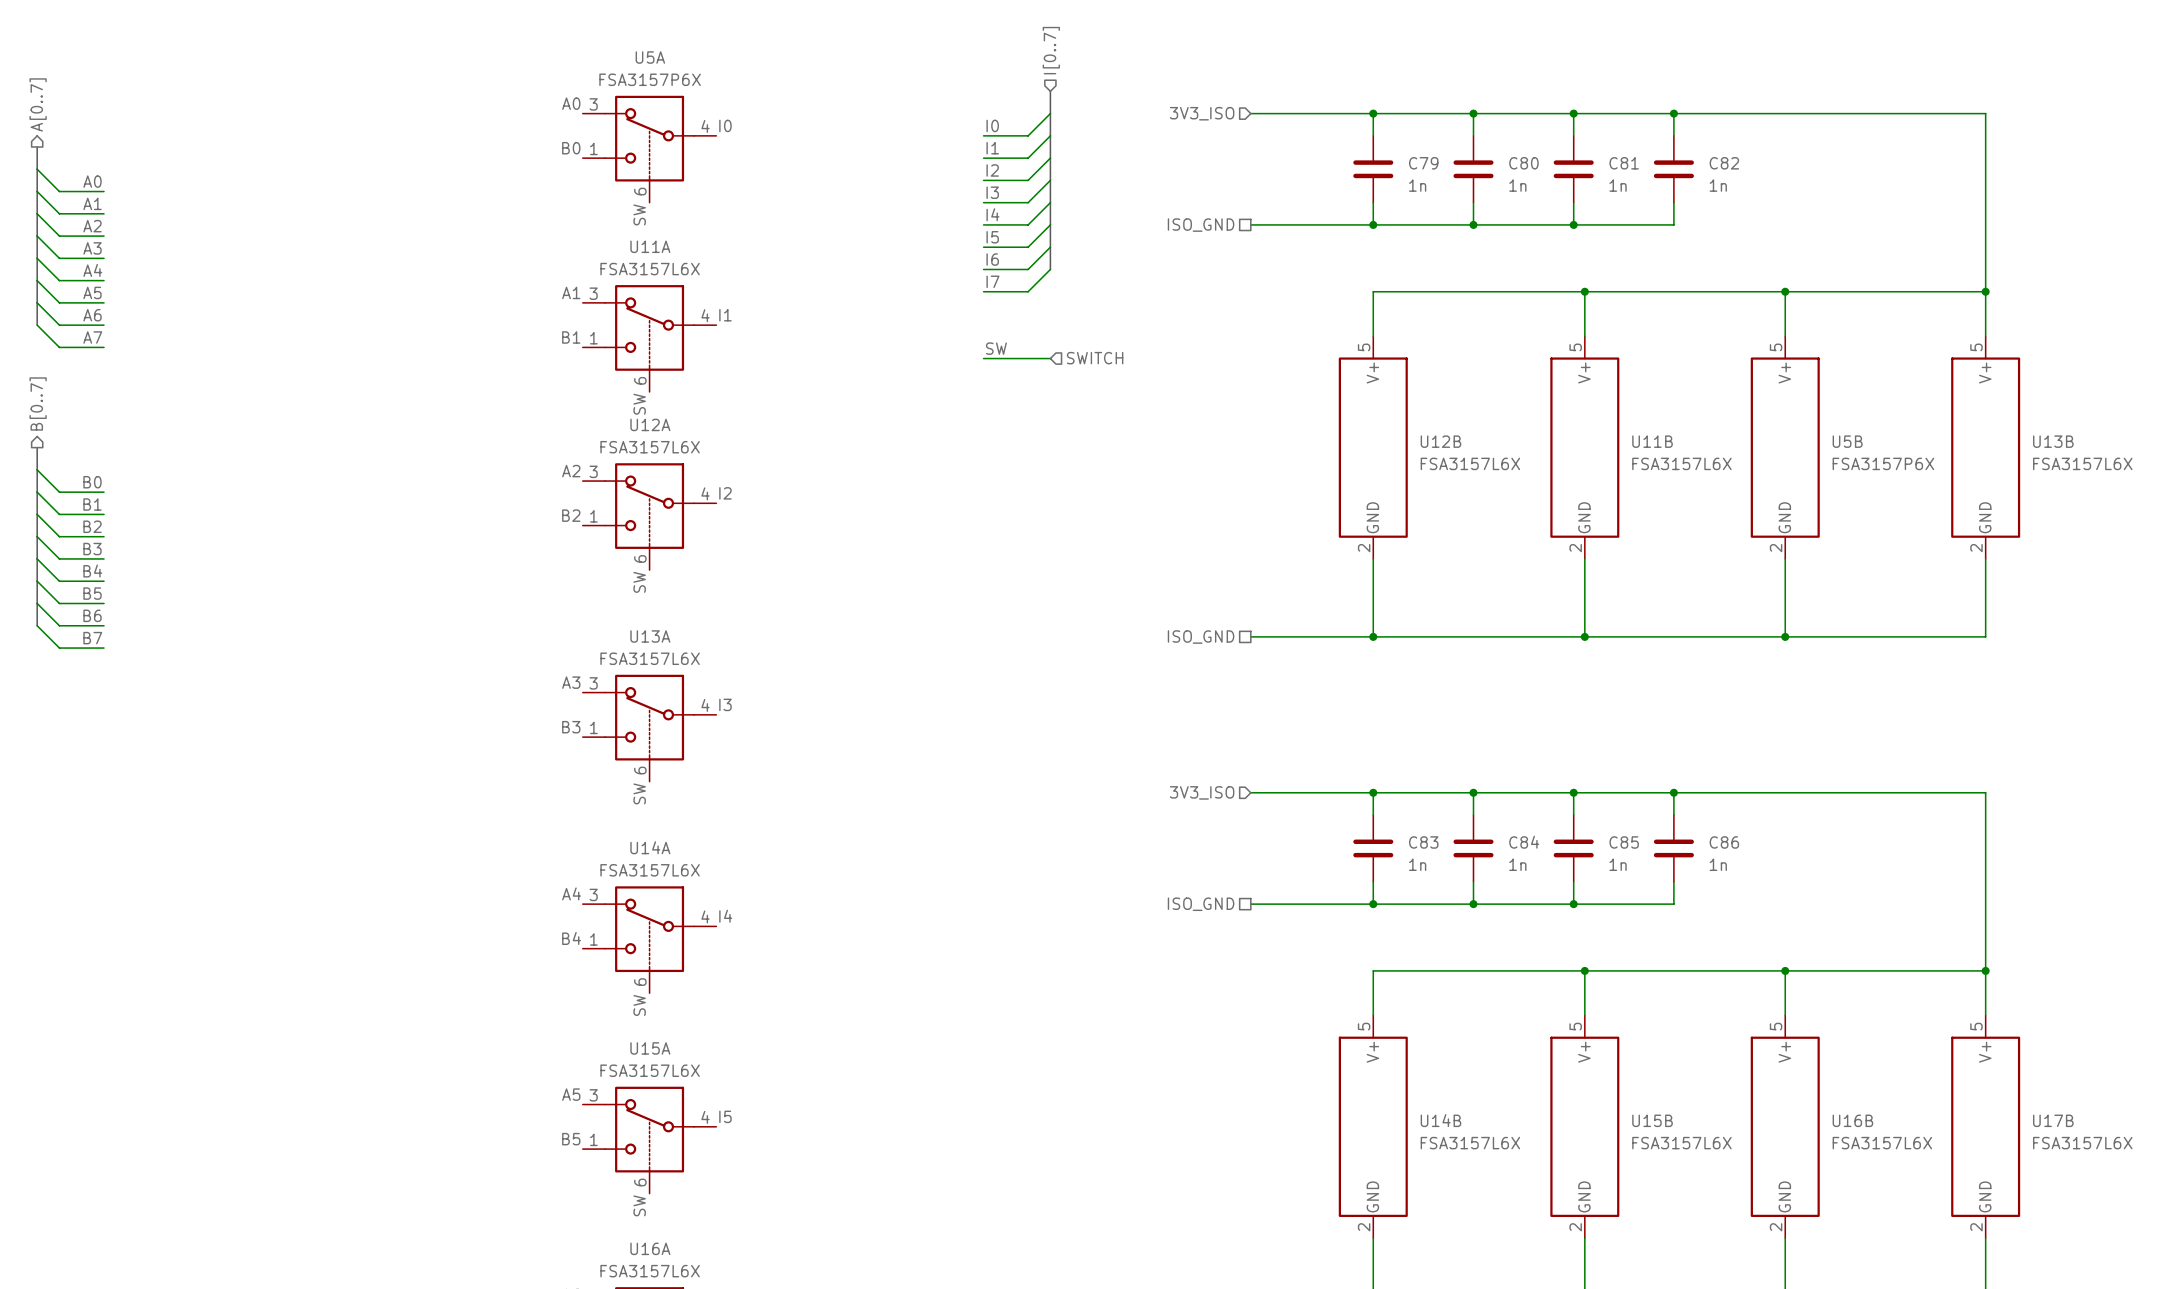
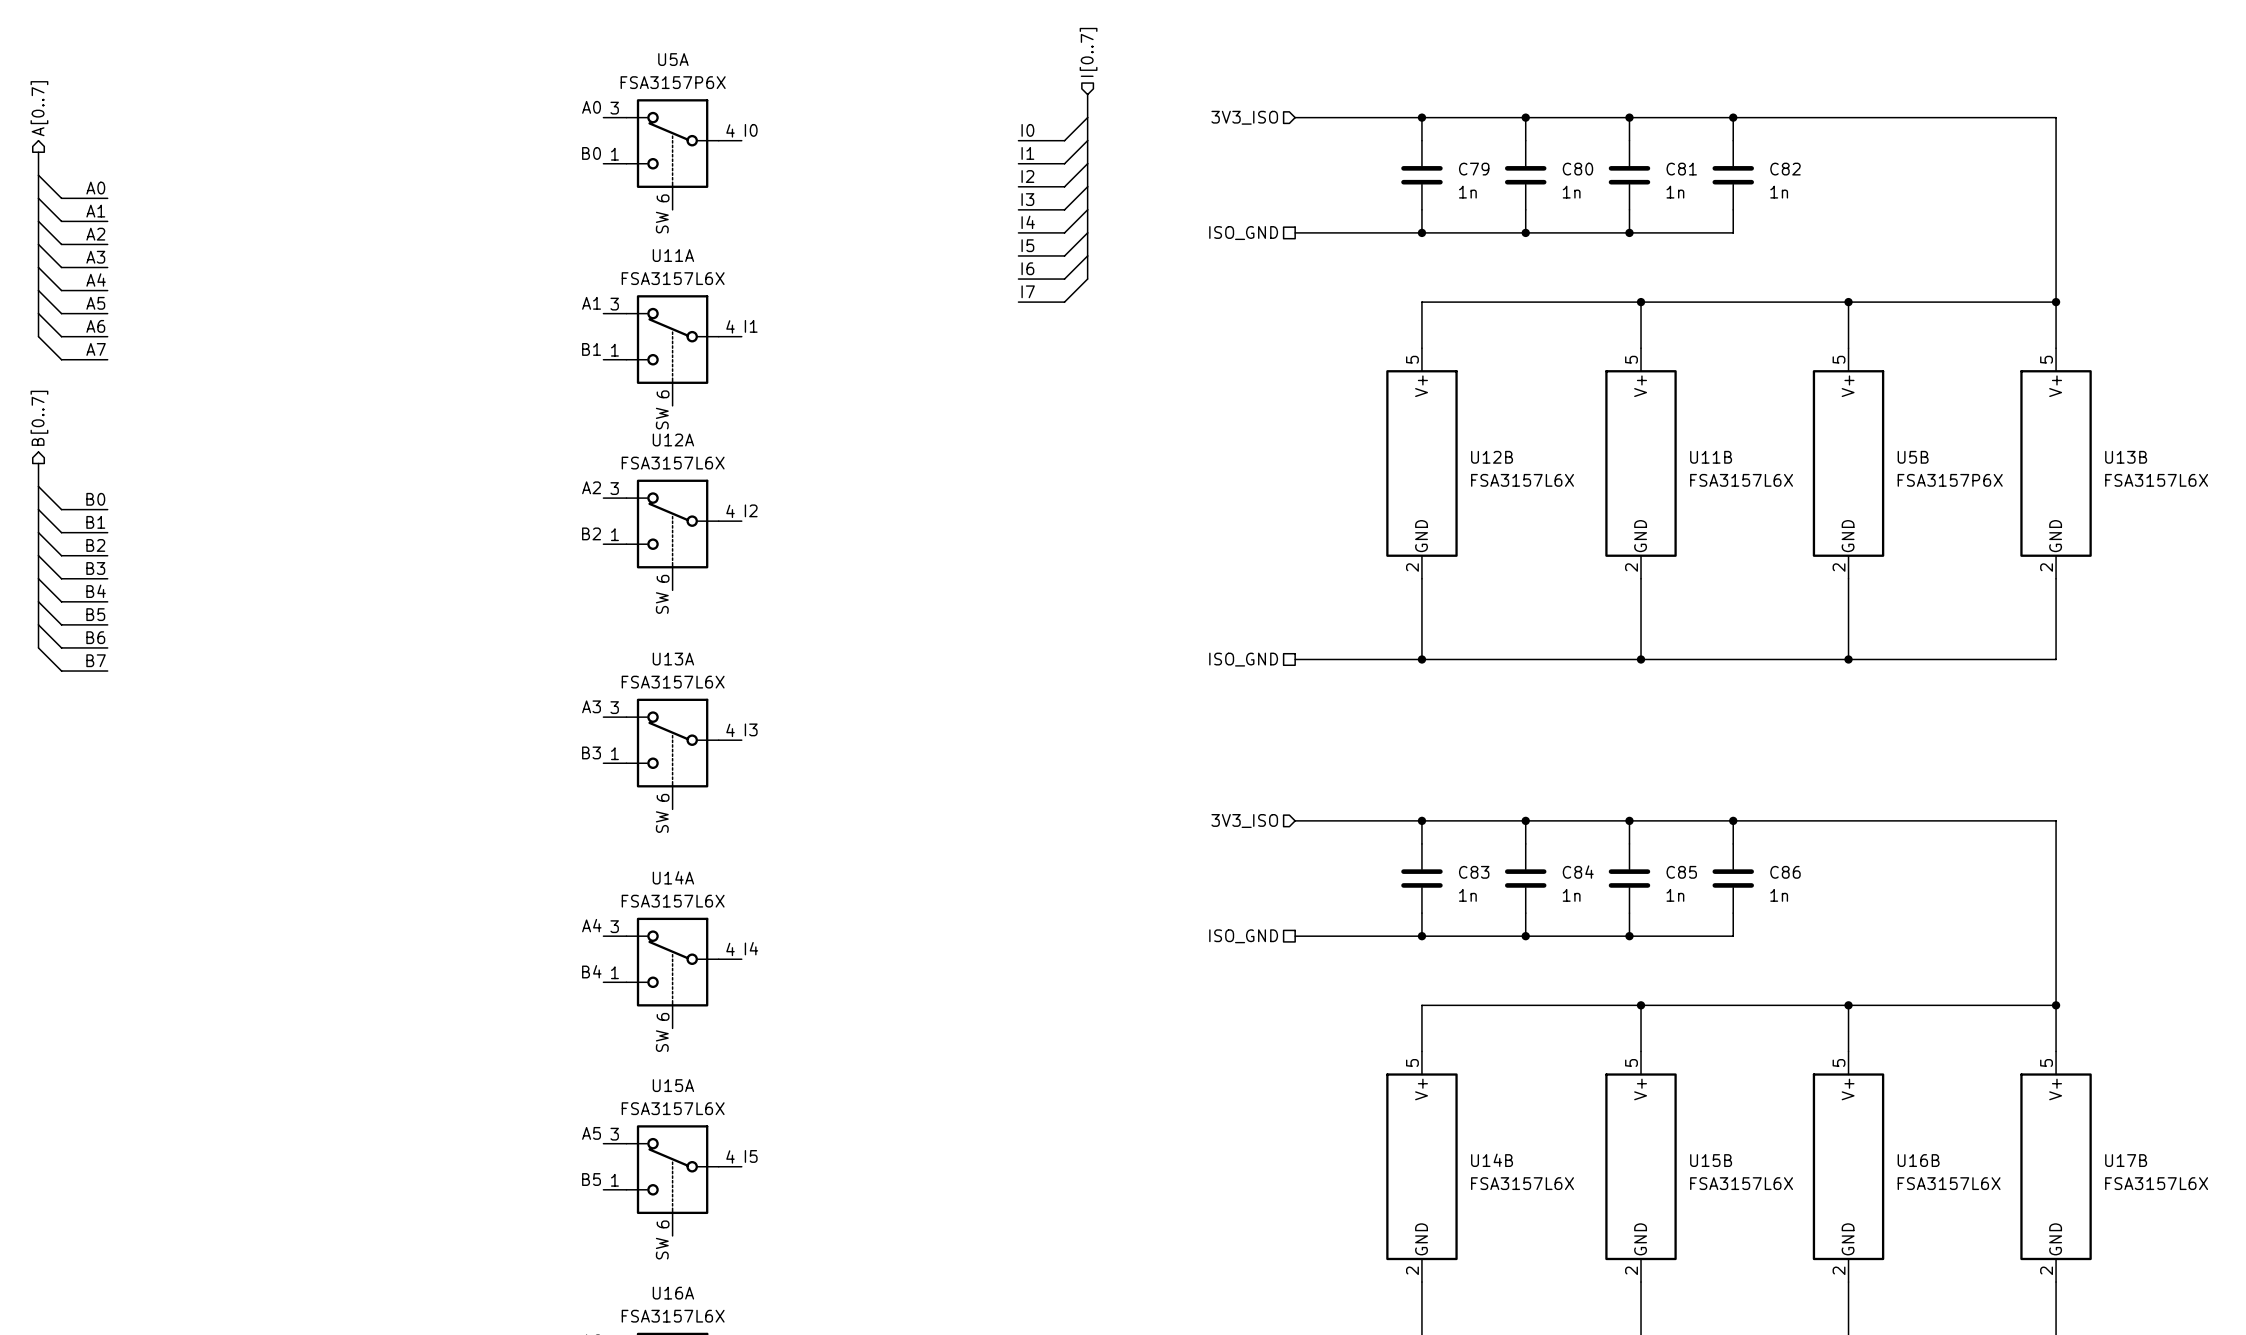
label: SW (996, 348) -> none
wire: (983, 358) (1050, 358) -> none
hierarchical label: SWITCH (1095, 358) -> none

